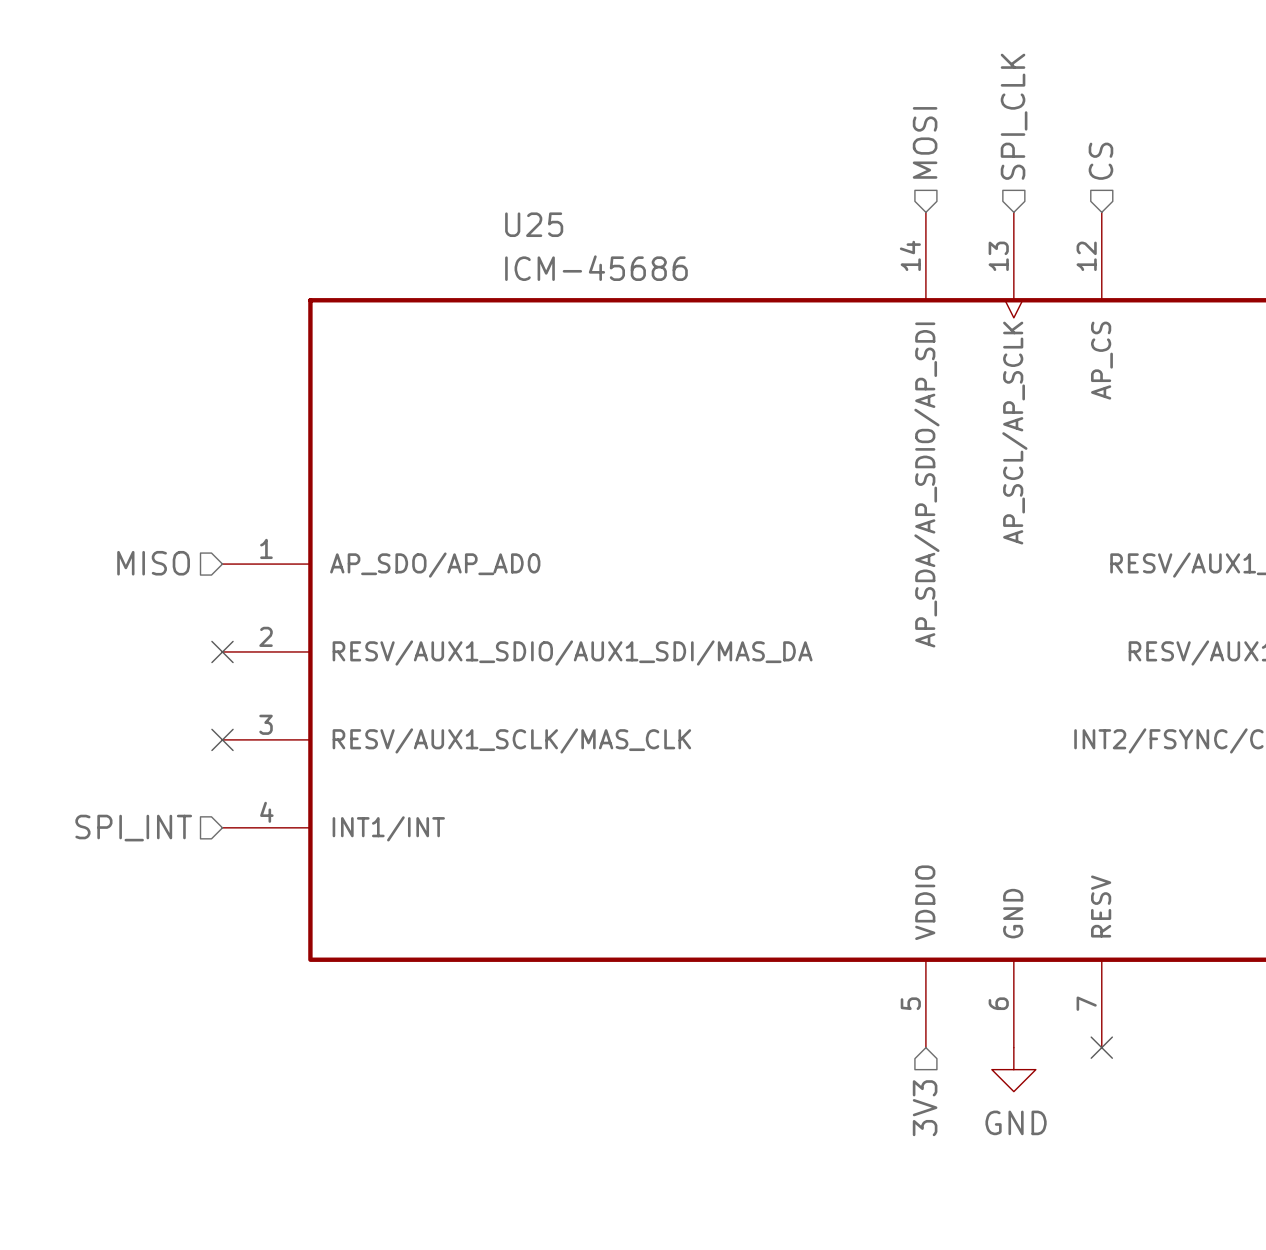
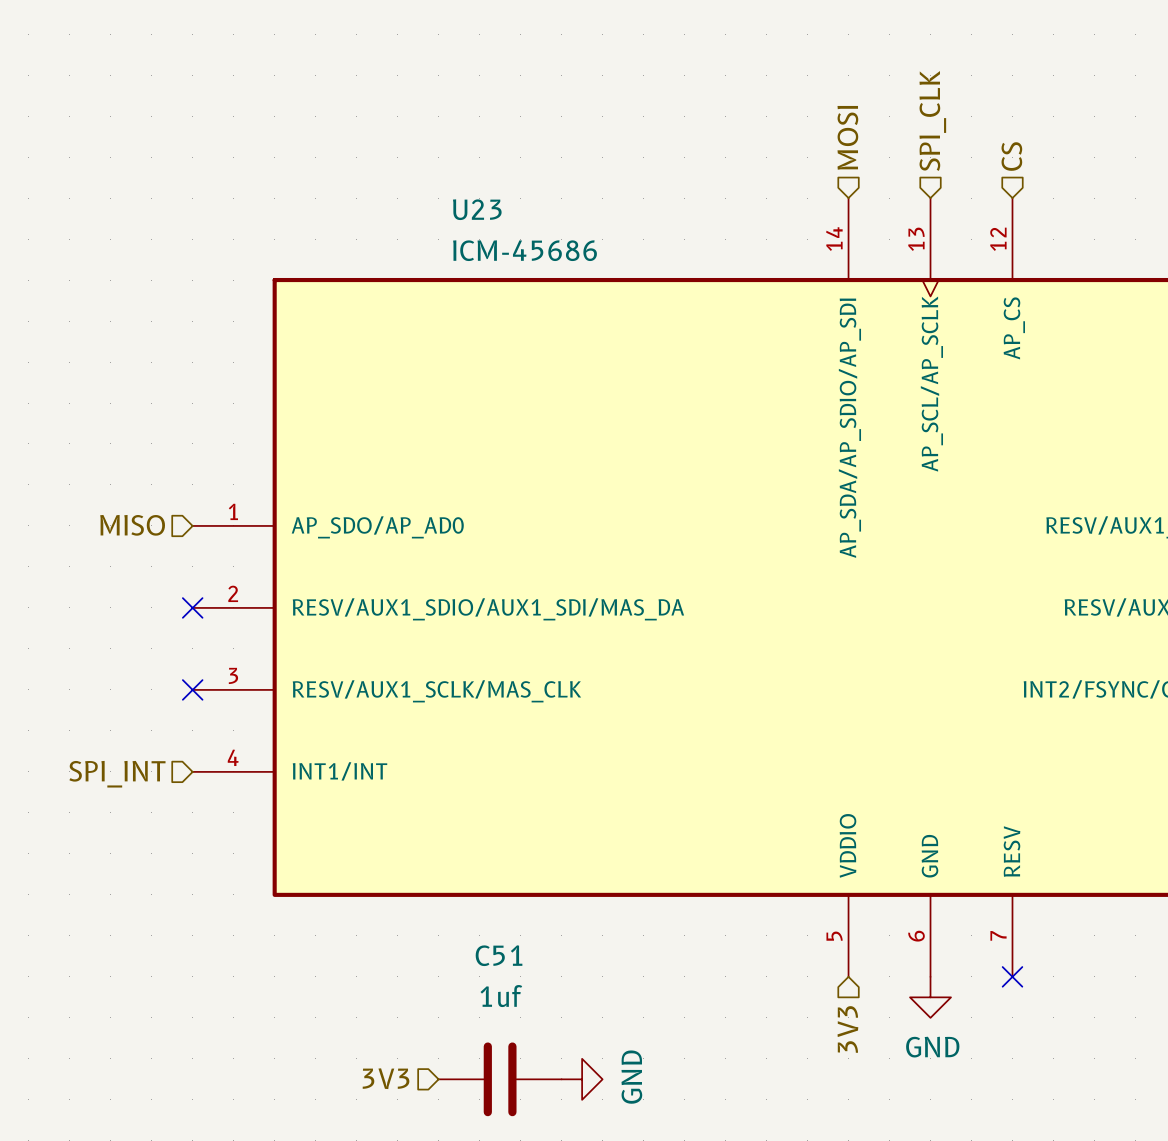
U25 name: U25 (534, 224) -> U23 (477, 209)
hierarchical label: none -> 3V3 (386, 1078)
C51: none -> 1uf (500, 1079)
power symbol: none -> GND (582, 1079)

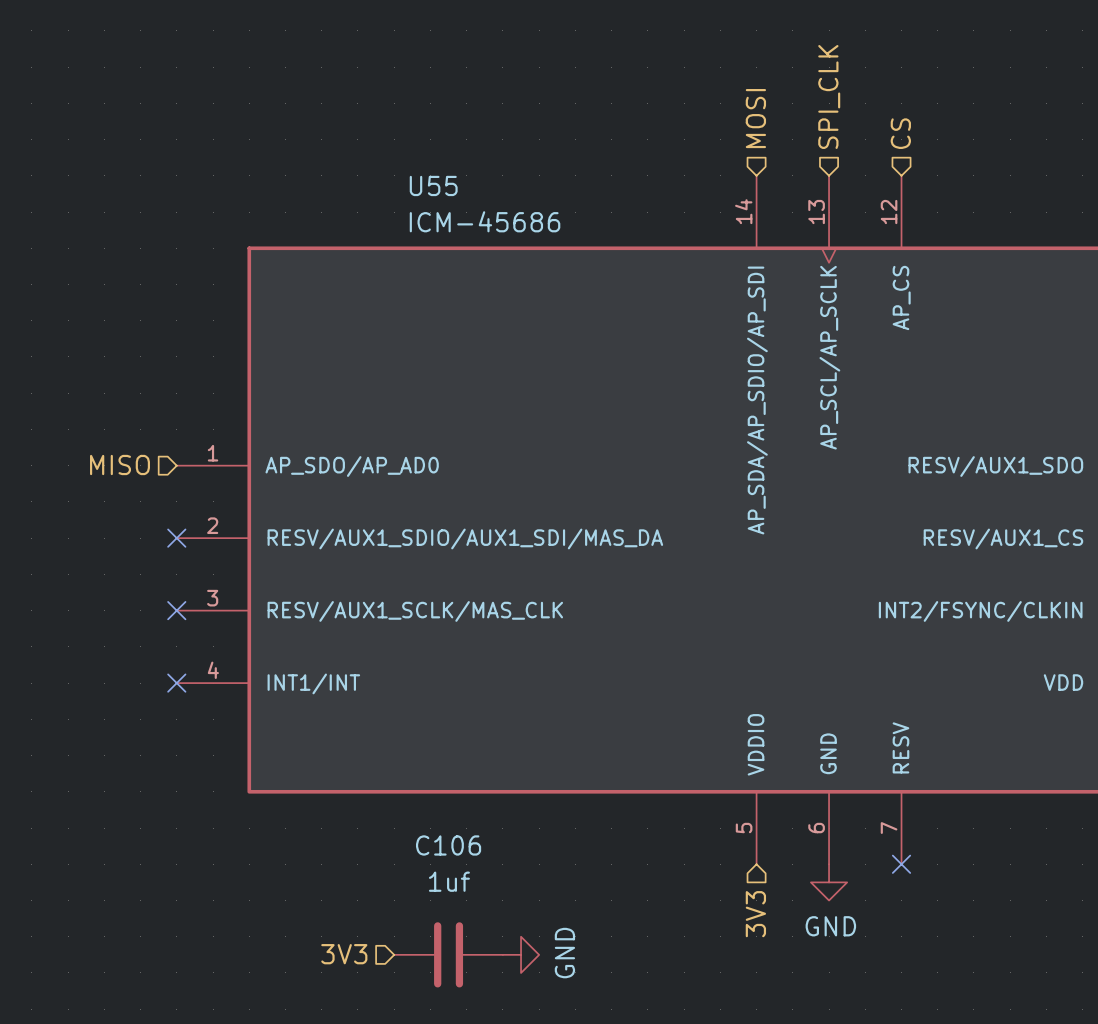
U23 name: U23 (477, 209) -> U55 (433, 185)
no-connect mark: none -> (176, 683)
hierarchical label: SPI_INT (117, 774) -> none
C51 name: C51 (499, 955) -> C106 (448, 845)

